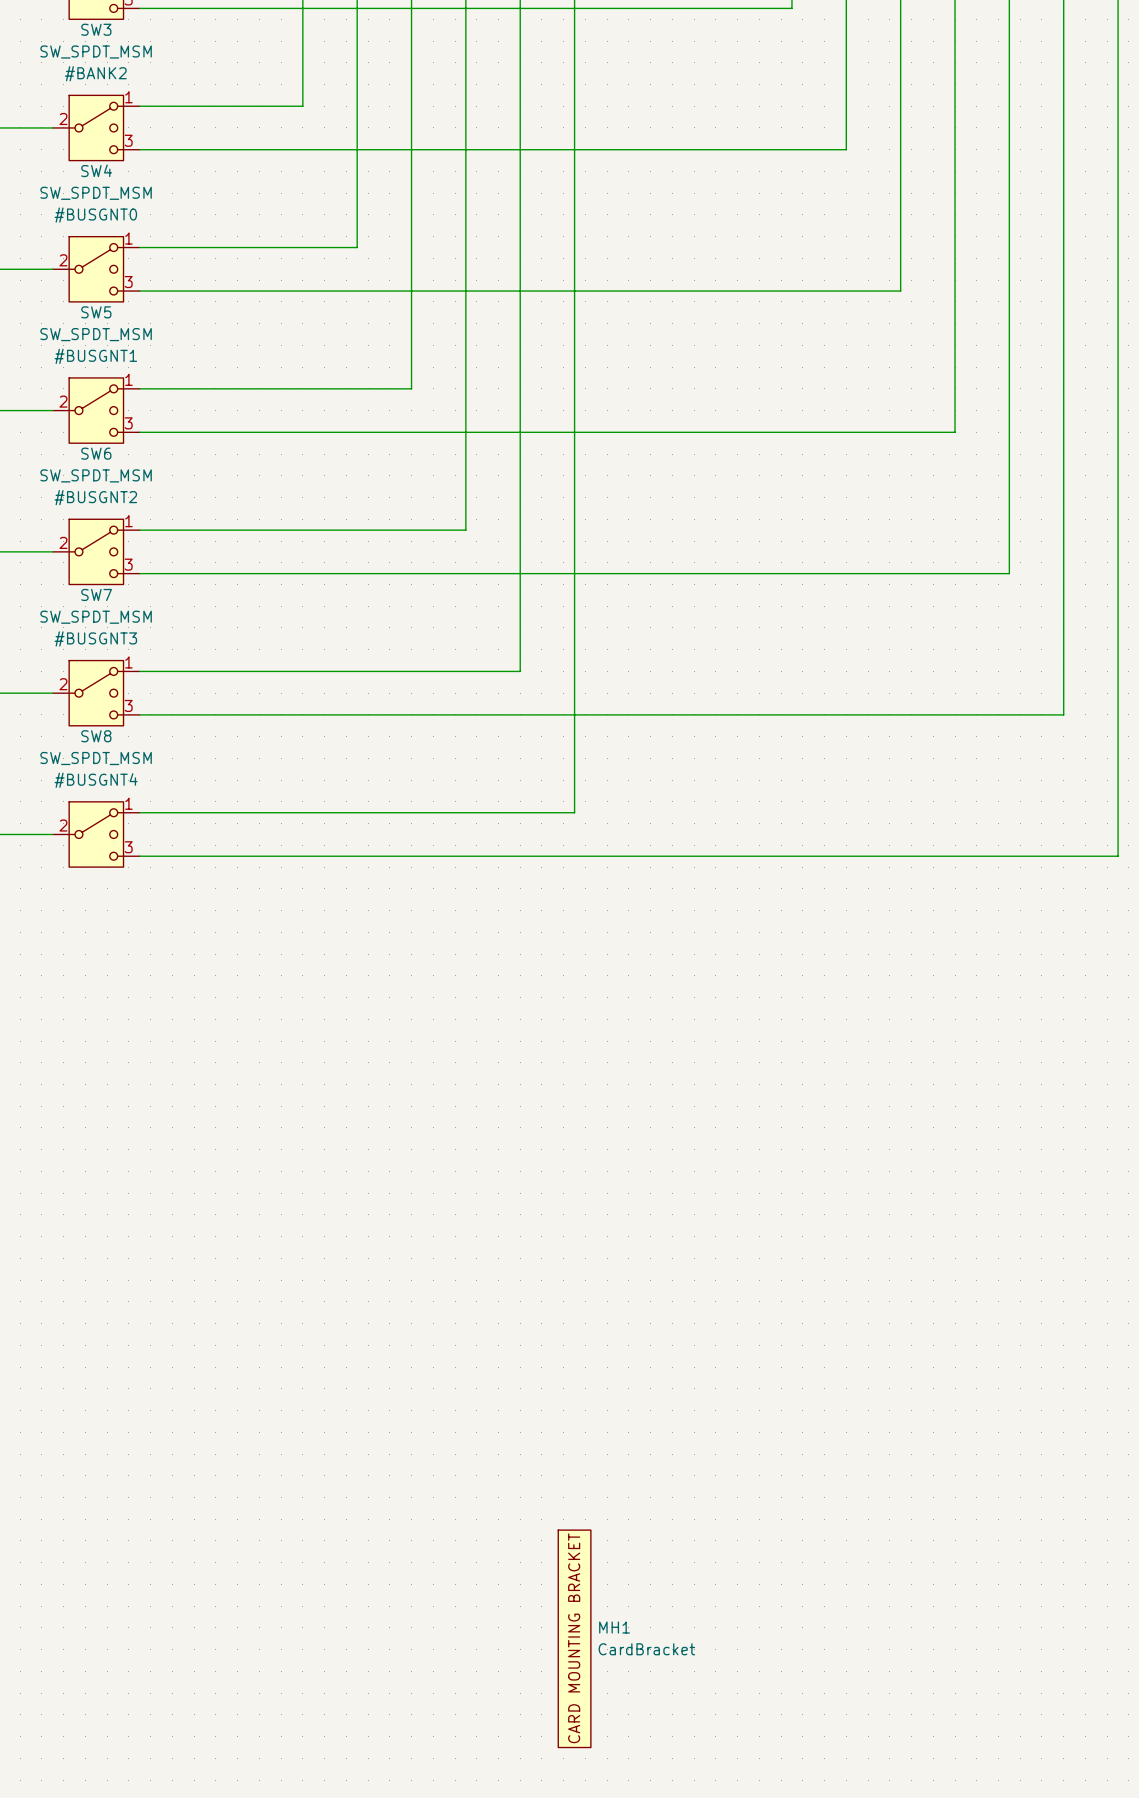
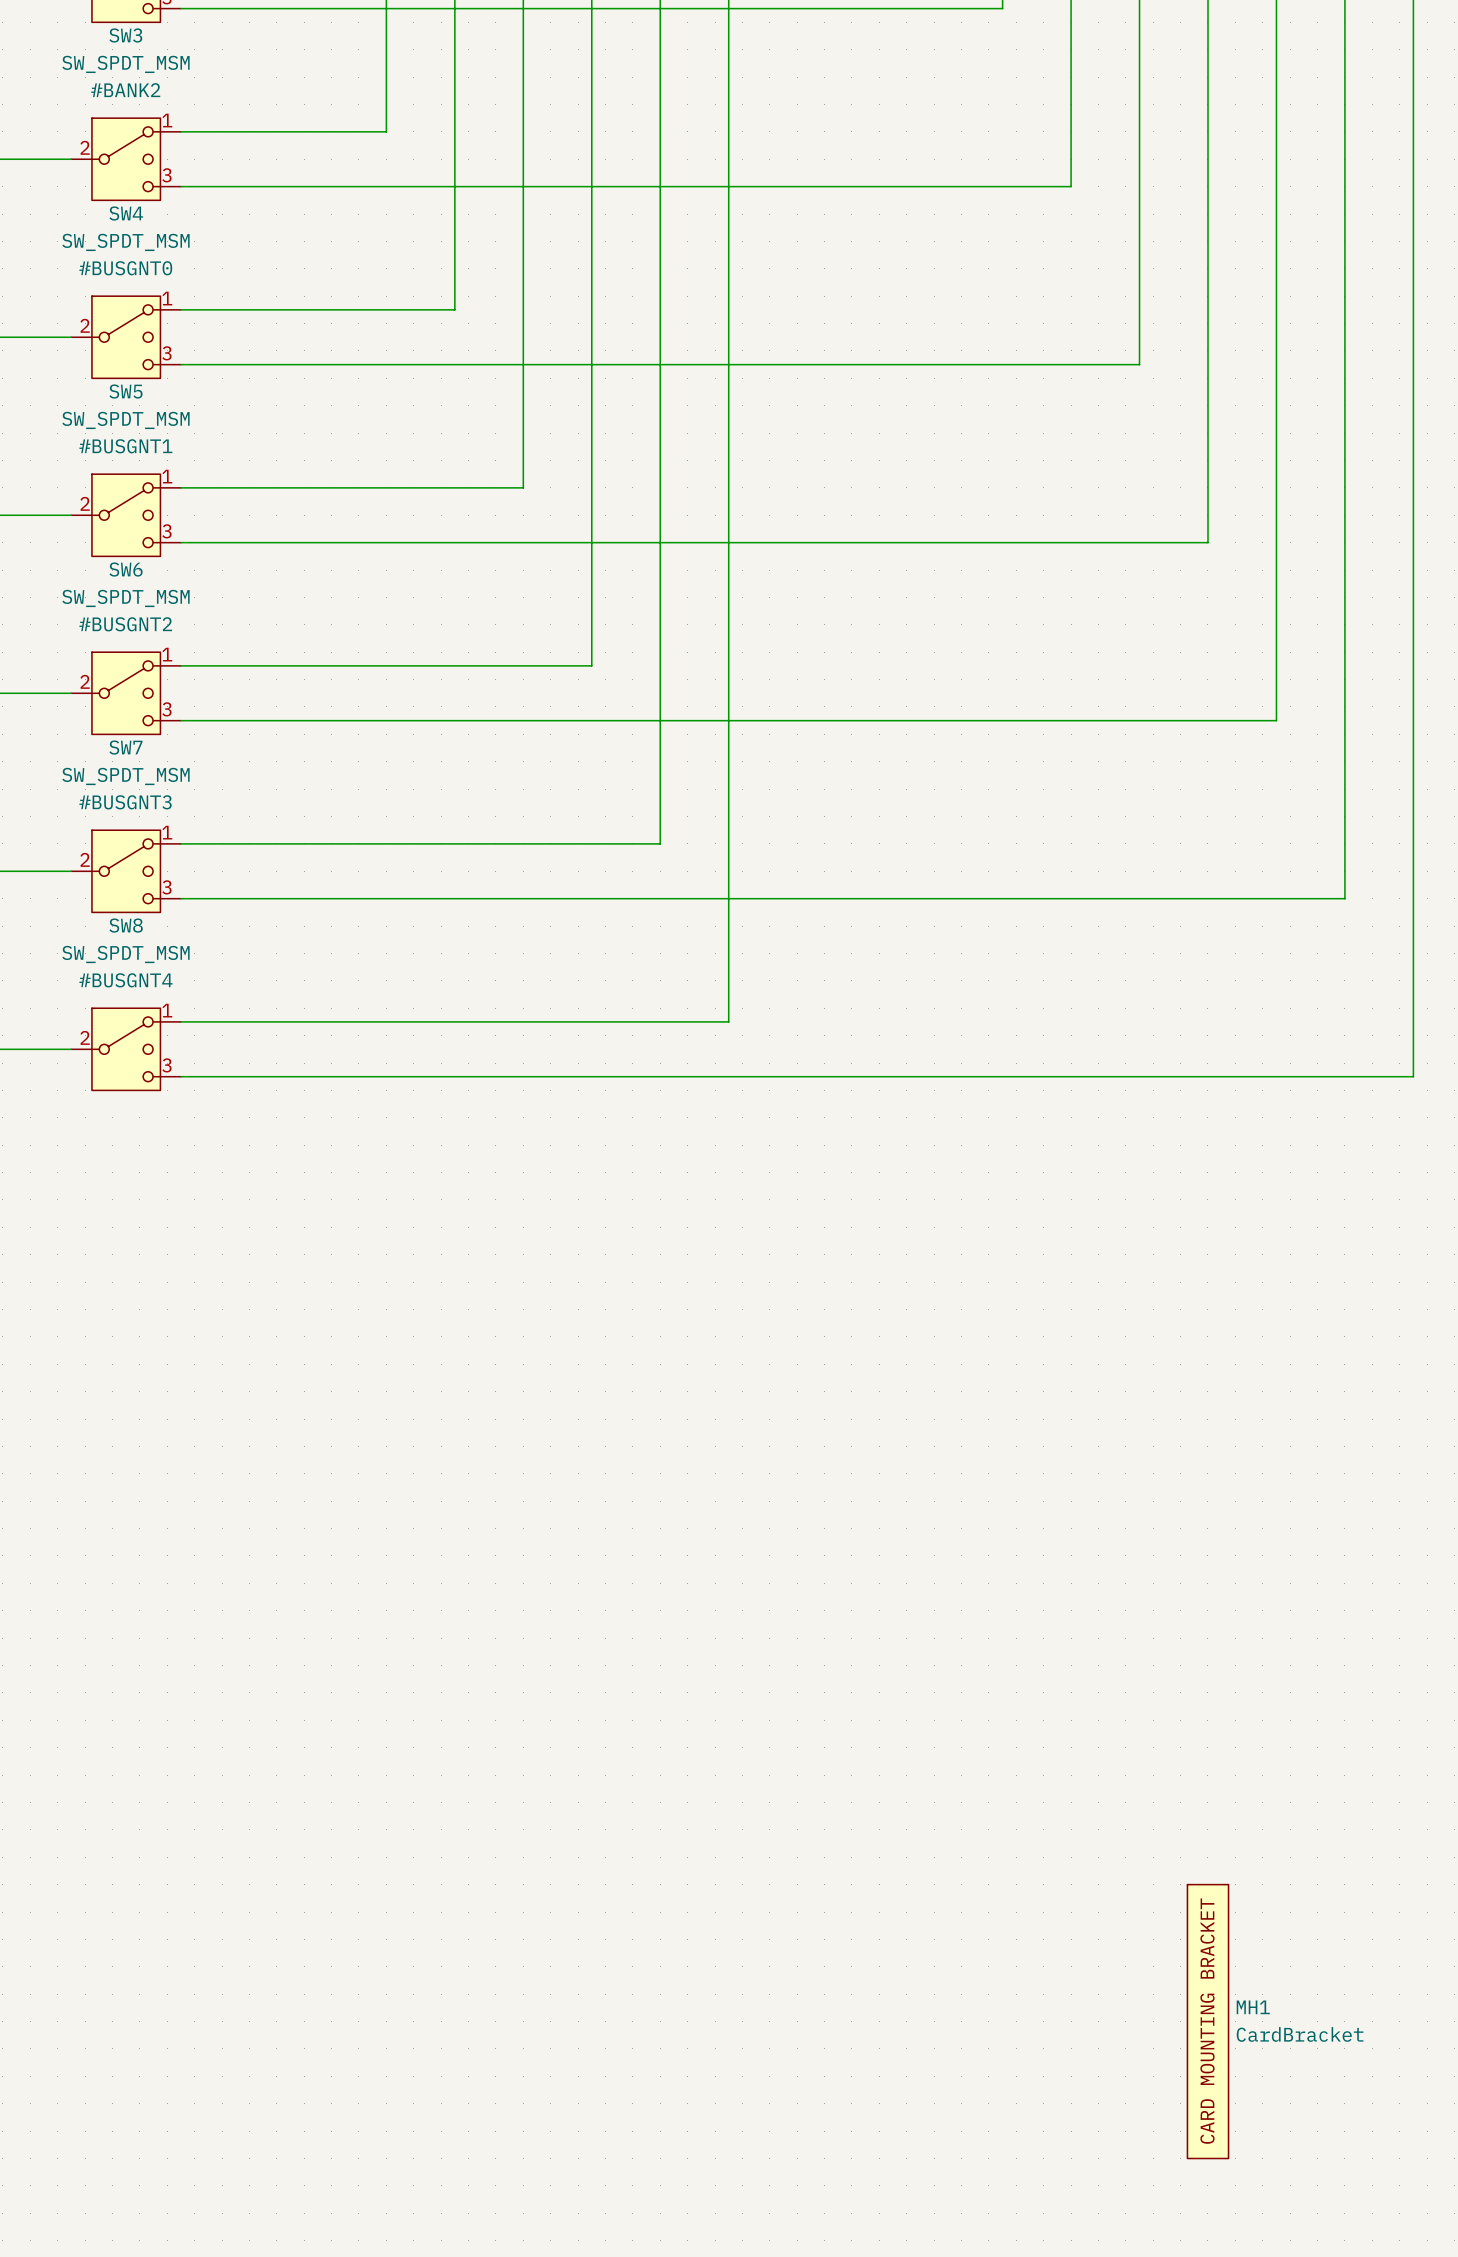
MH1 position: (574, 1638) -> (1207, 2021)

